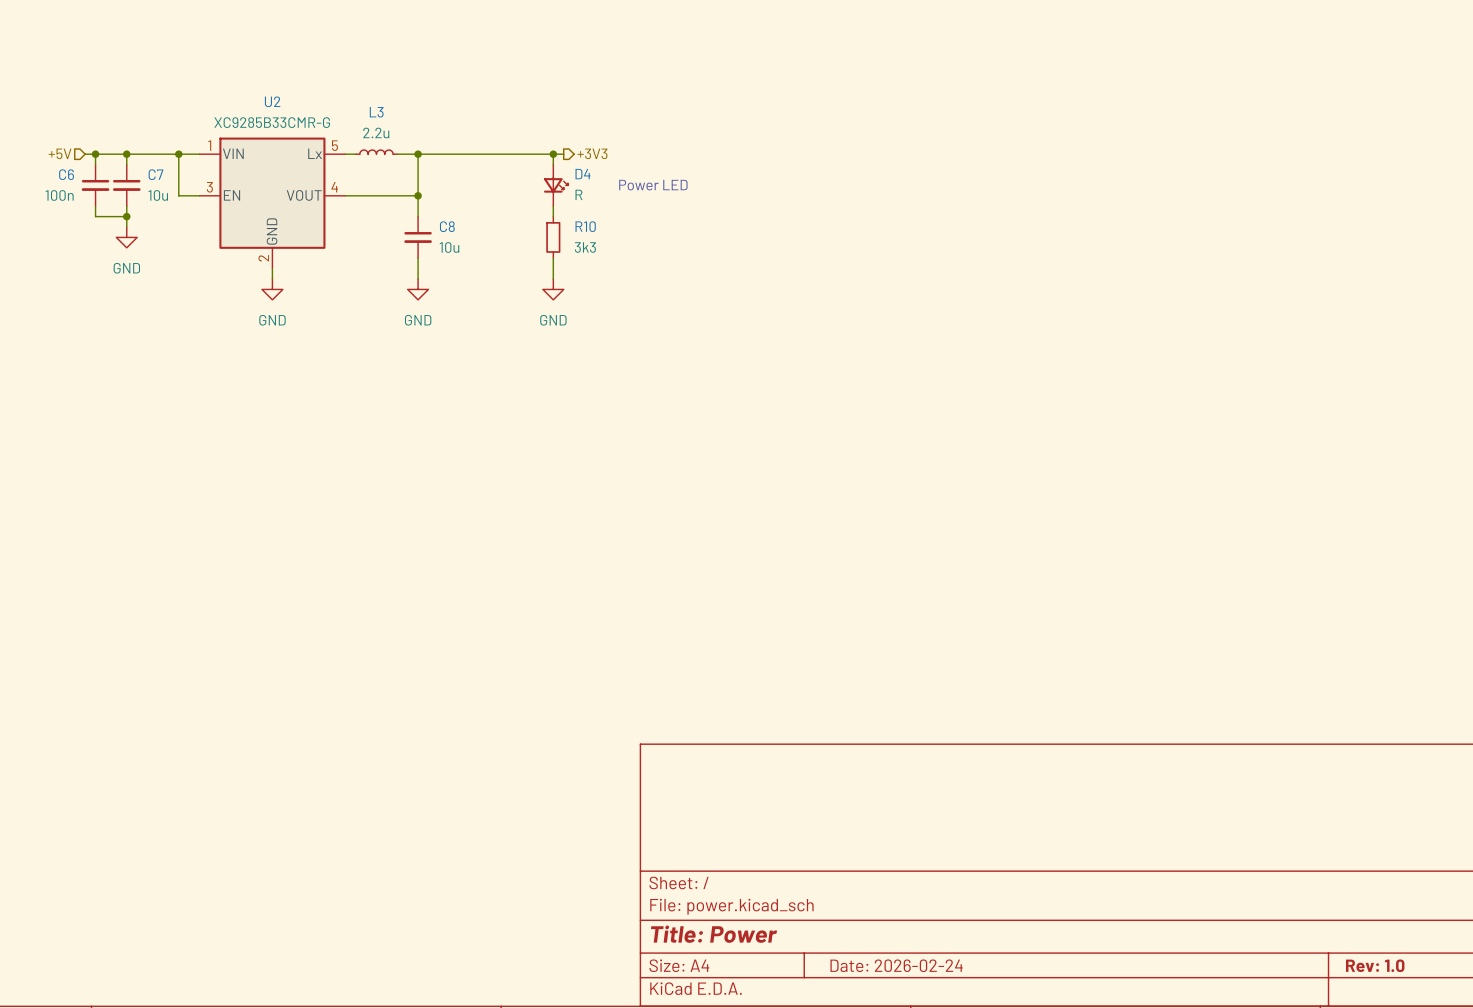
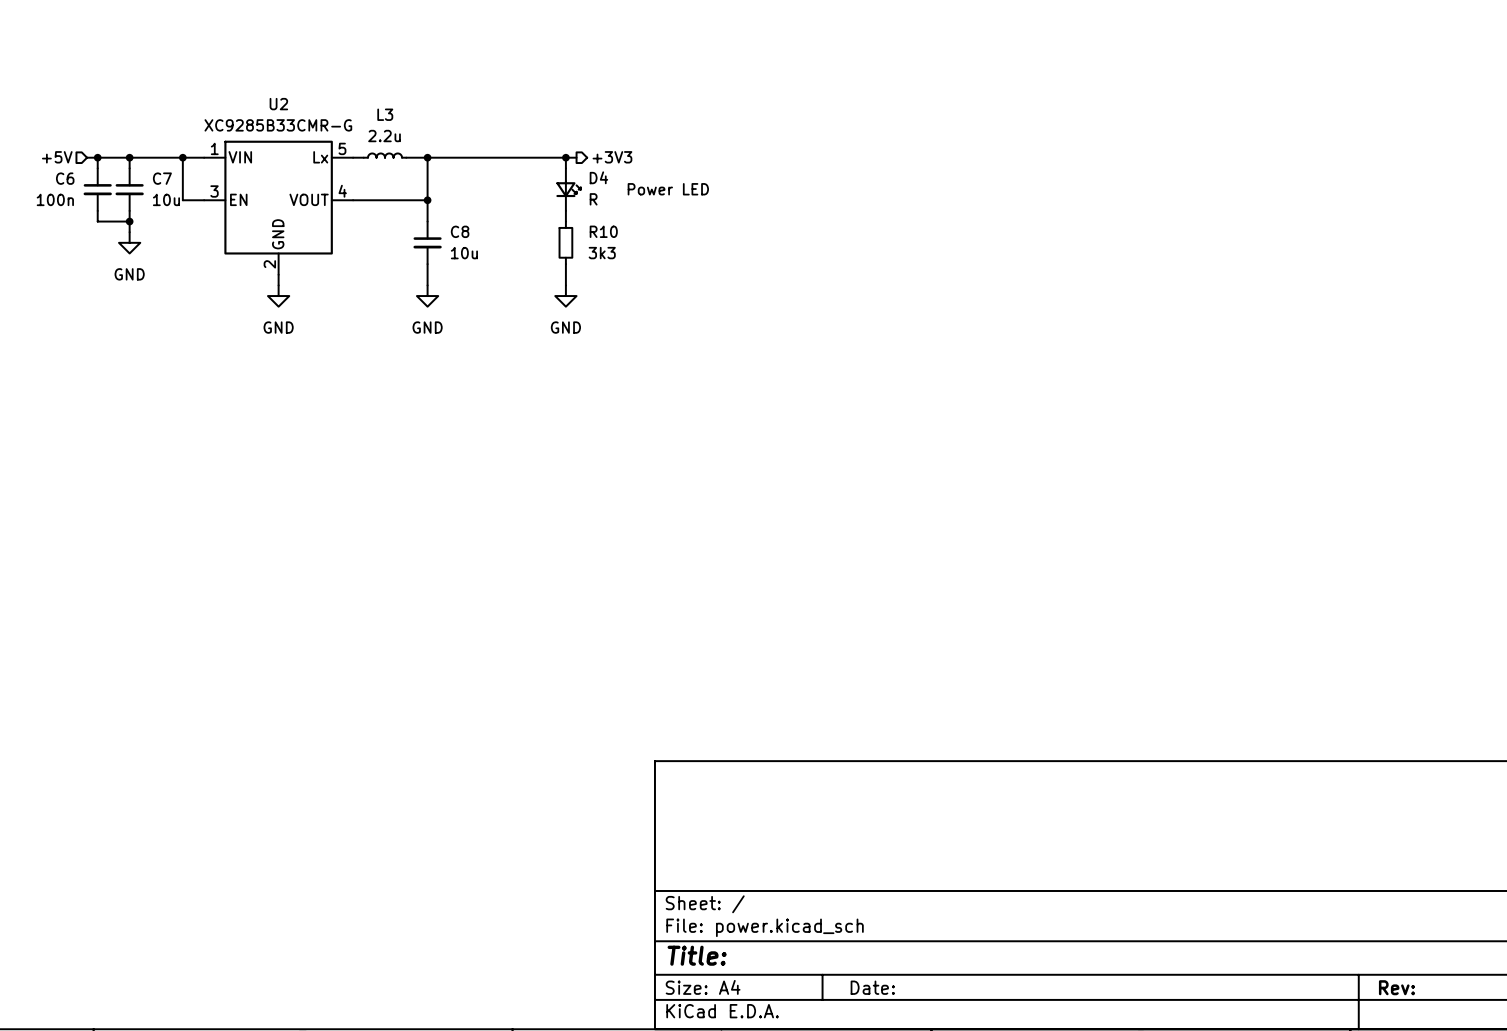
title block: Title: Power (714, 934) -> Title: (697, 955)
title block: Date: 2026-02-24 (896, 965) -> Date: (872, 987)
title block: Rev: 1.0 (1375, 965) -> Rev: (1396, 987)

